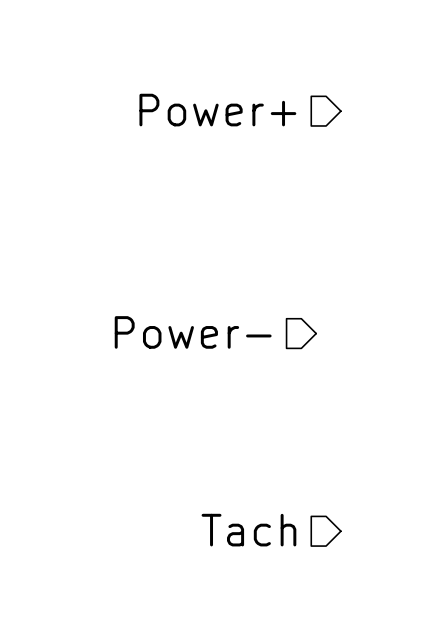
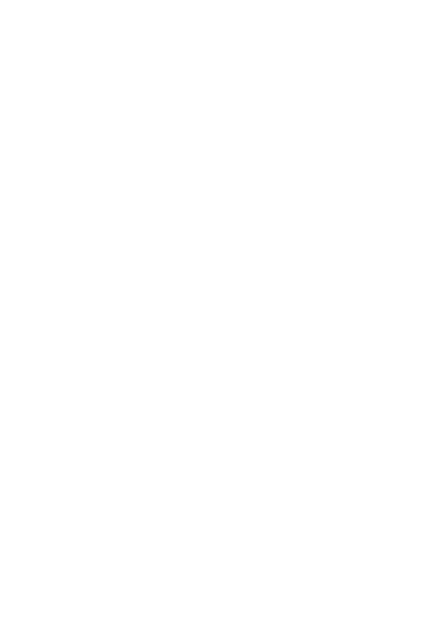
hierarchical label: Power+ (217, 110) -> none
hierarchical label: Power- (193, 332) -> none
hierarchical label: Tach (248, 530) -> none

